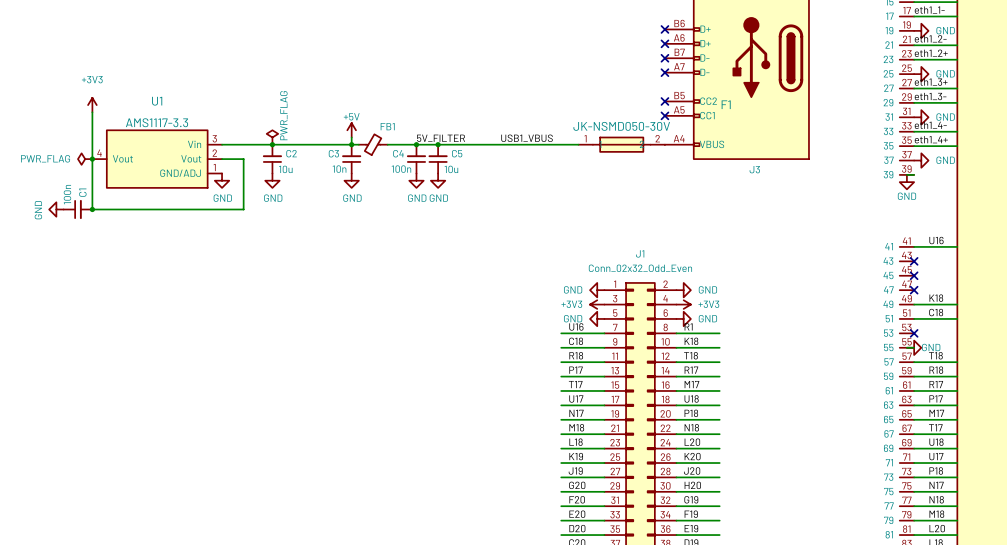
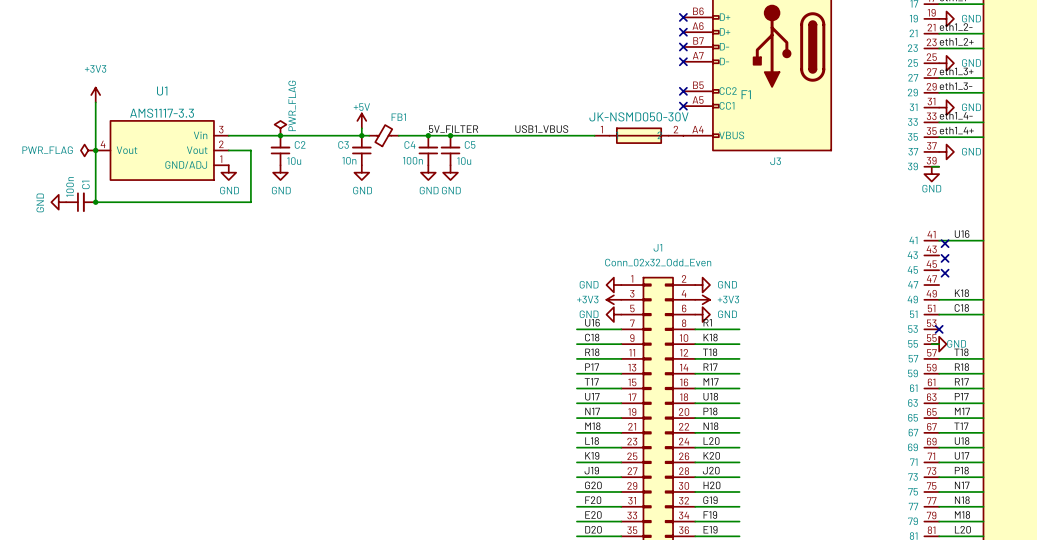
no-connect mark: none -> (945, 243)
no-connect mark: (914, 261) -> none
no-connect mark: none -> (945, 258)
no-connect mark: (914, 275) -> none
no-connect mark: none -> (945, 273)
no-connect mark: (914, 290) -> none

